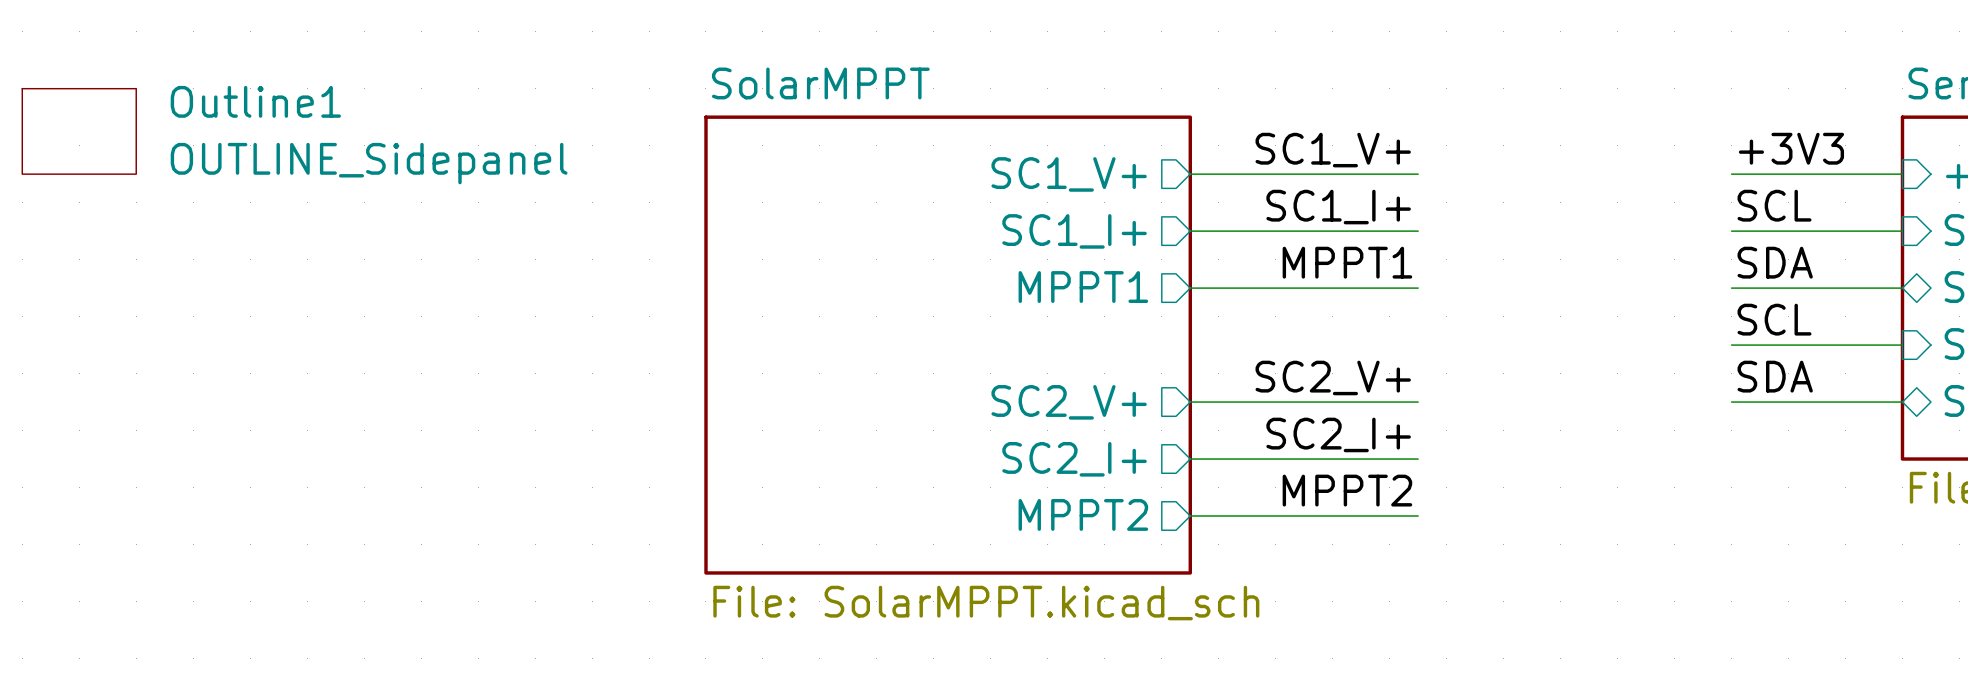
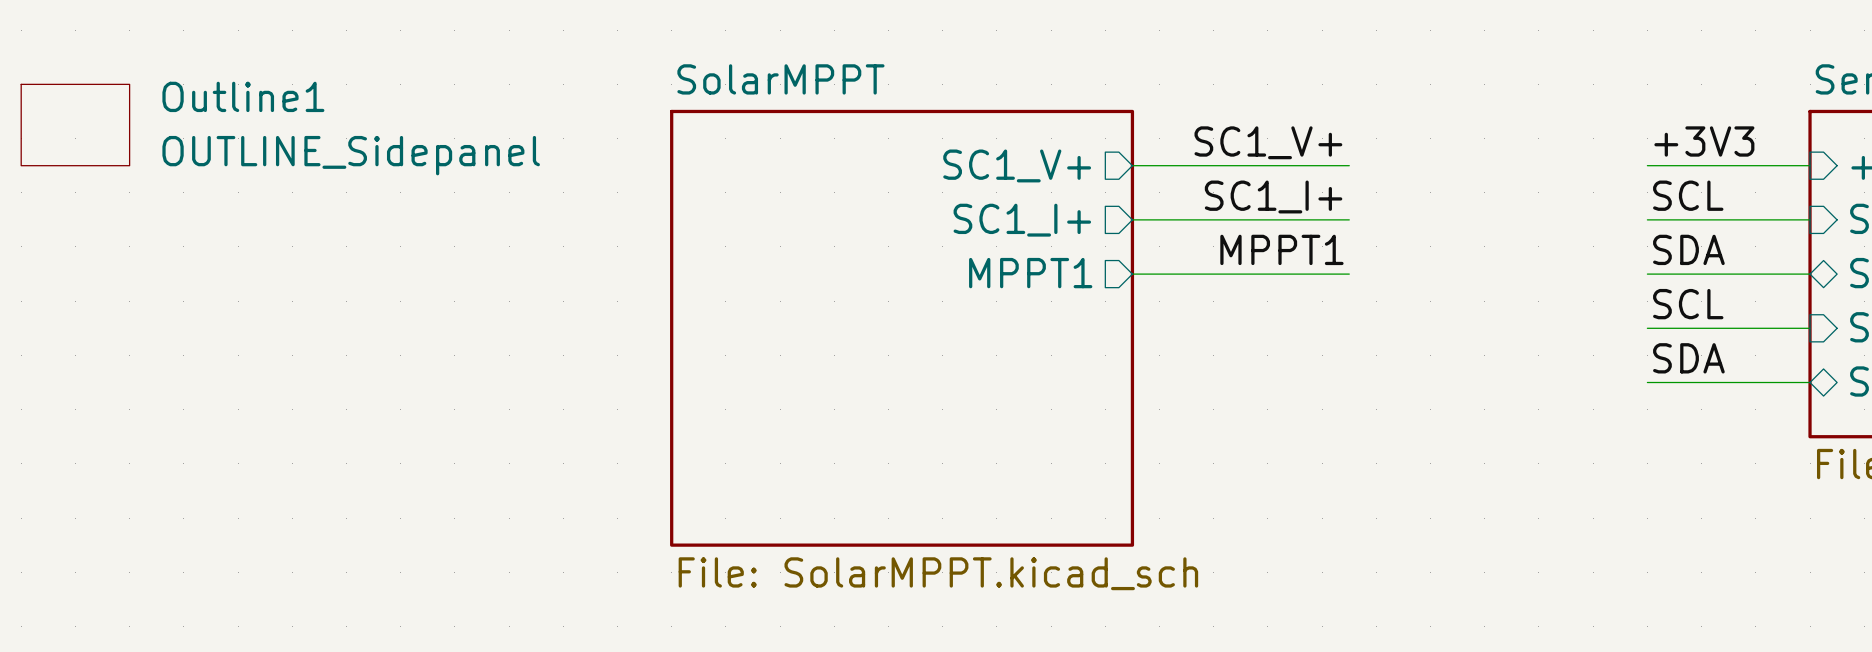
label: SC2_V+ (1333, 377) -> none
sheet pin: SC2_V+ (1069, 402) -> none
wire: (1190, 402) (1418, 402) -> none
label: SC2_I+ (1338, 434) -> none
sheet pin: SC2_I+ (1074, 459) -> none
wire: (1190, 459) (1418, 459) -> none
label: MPPT2 (1347, 490) -> none
sheet pin: MPPT2 (1083, 514) -> none
wire: (1190, 516) (1418, 516) -> none

